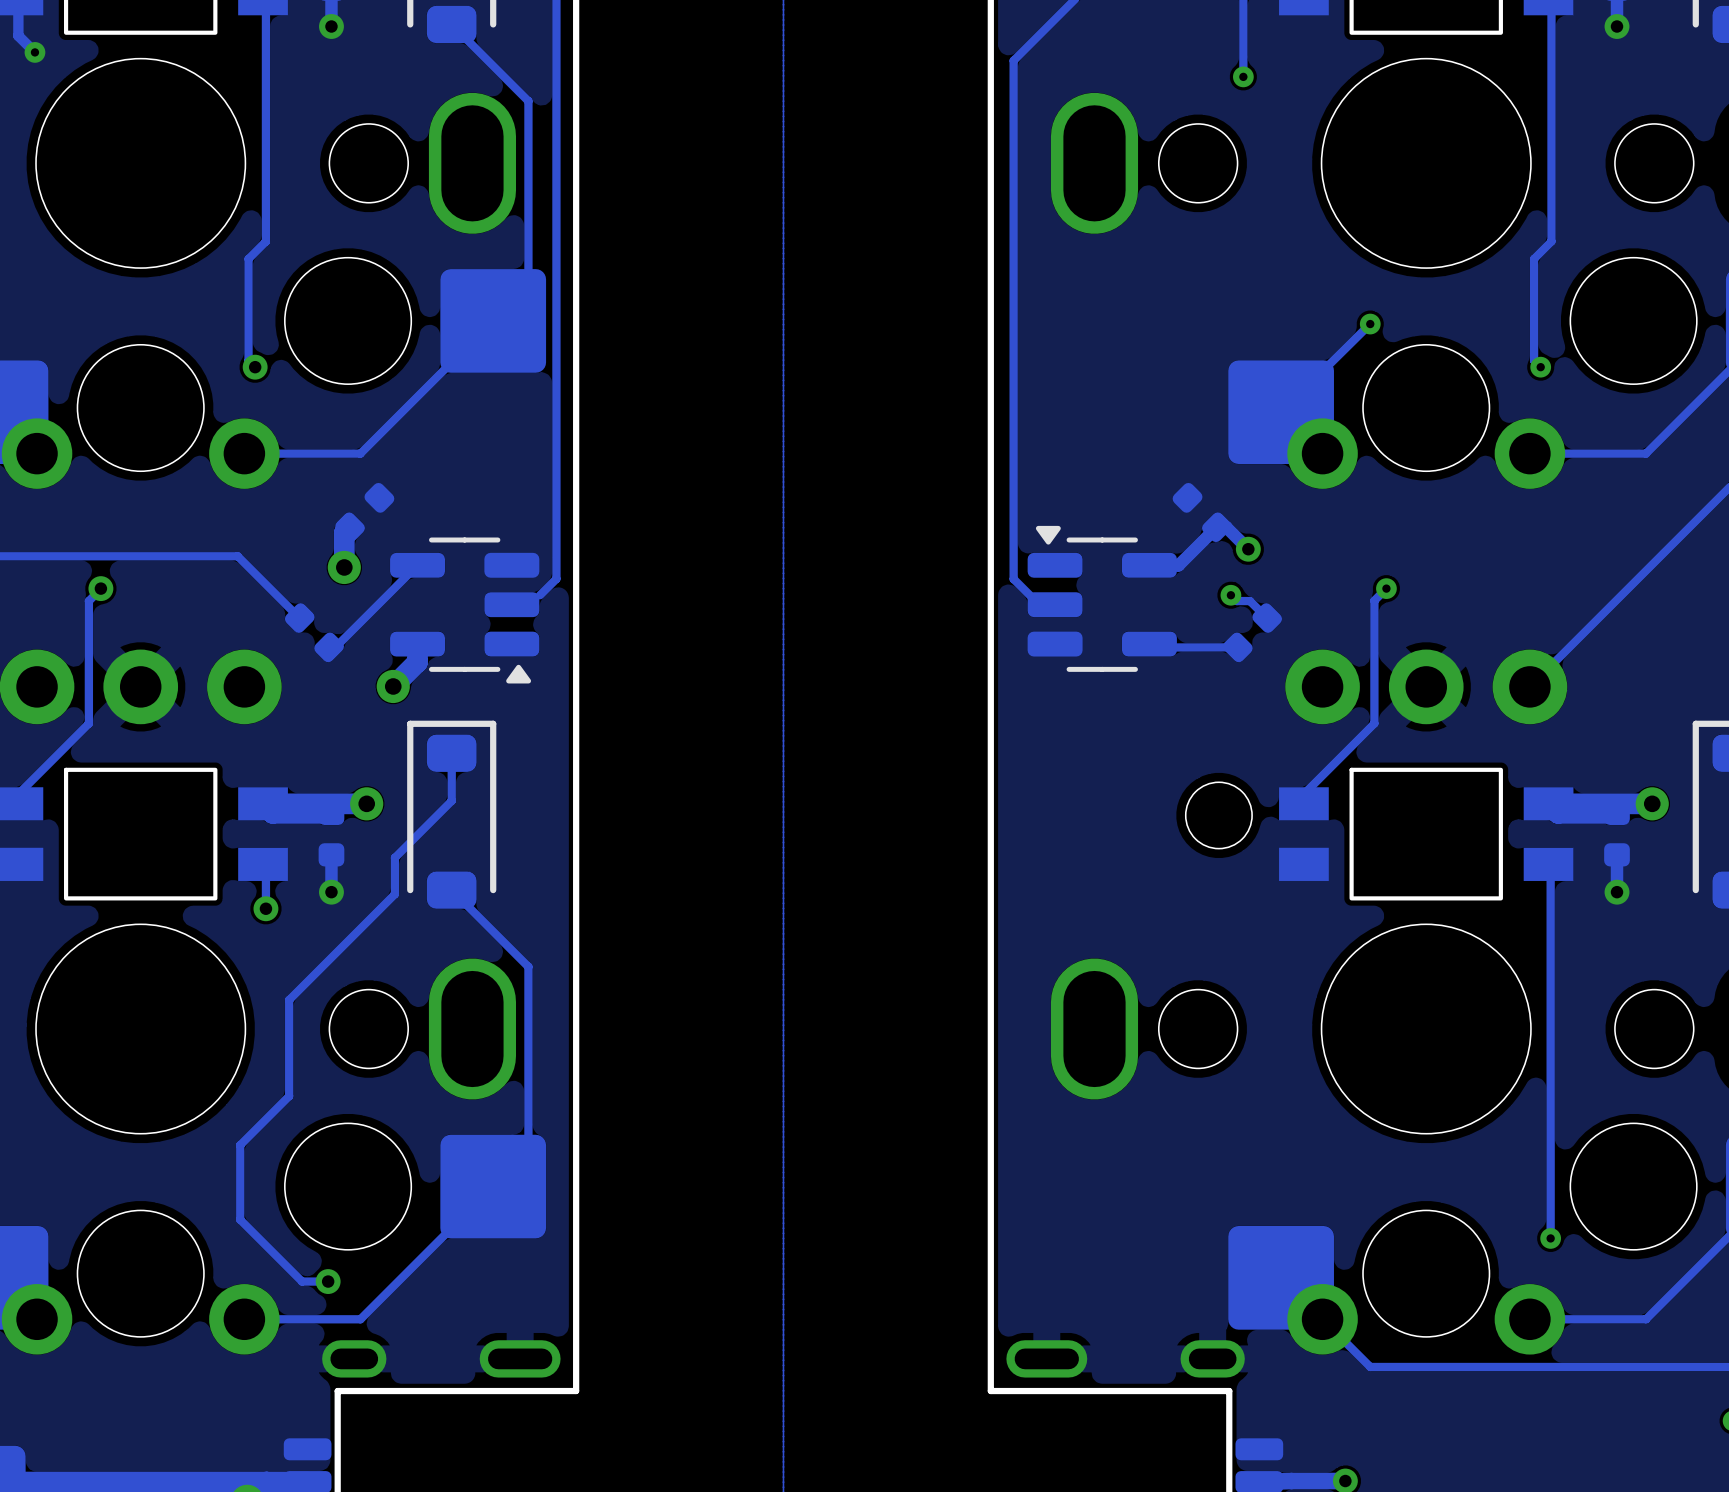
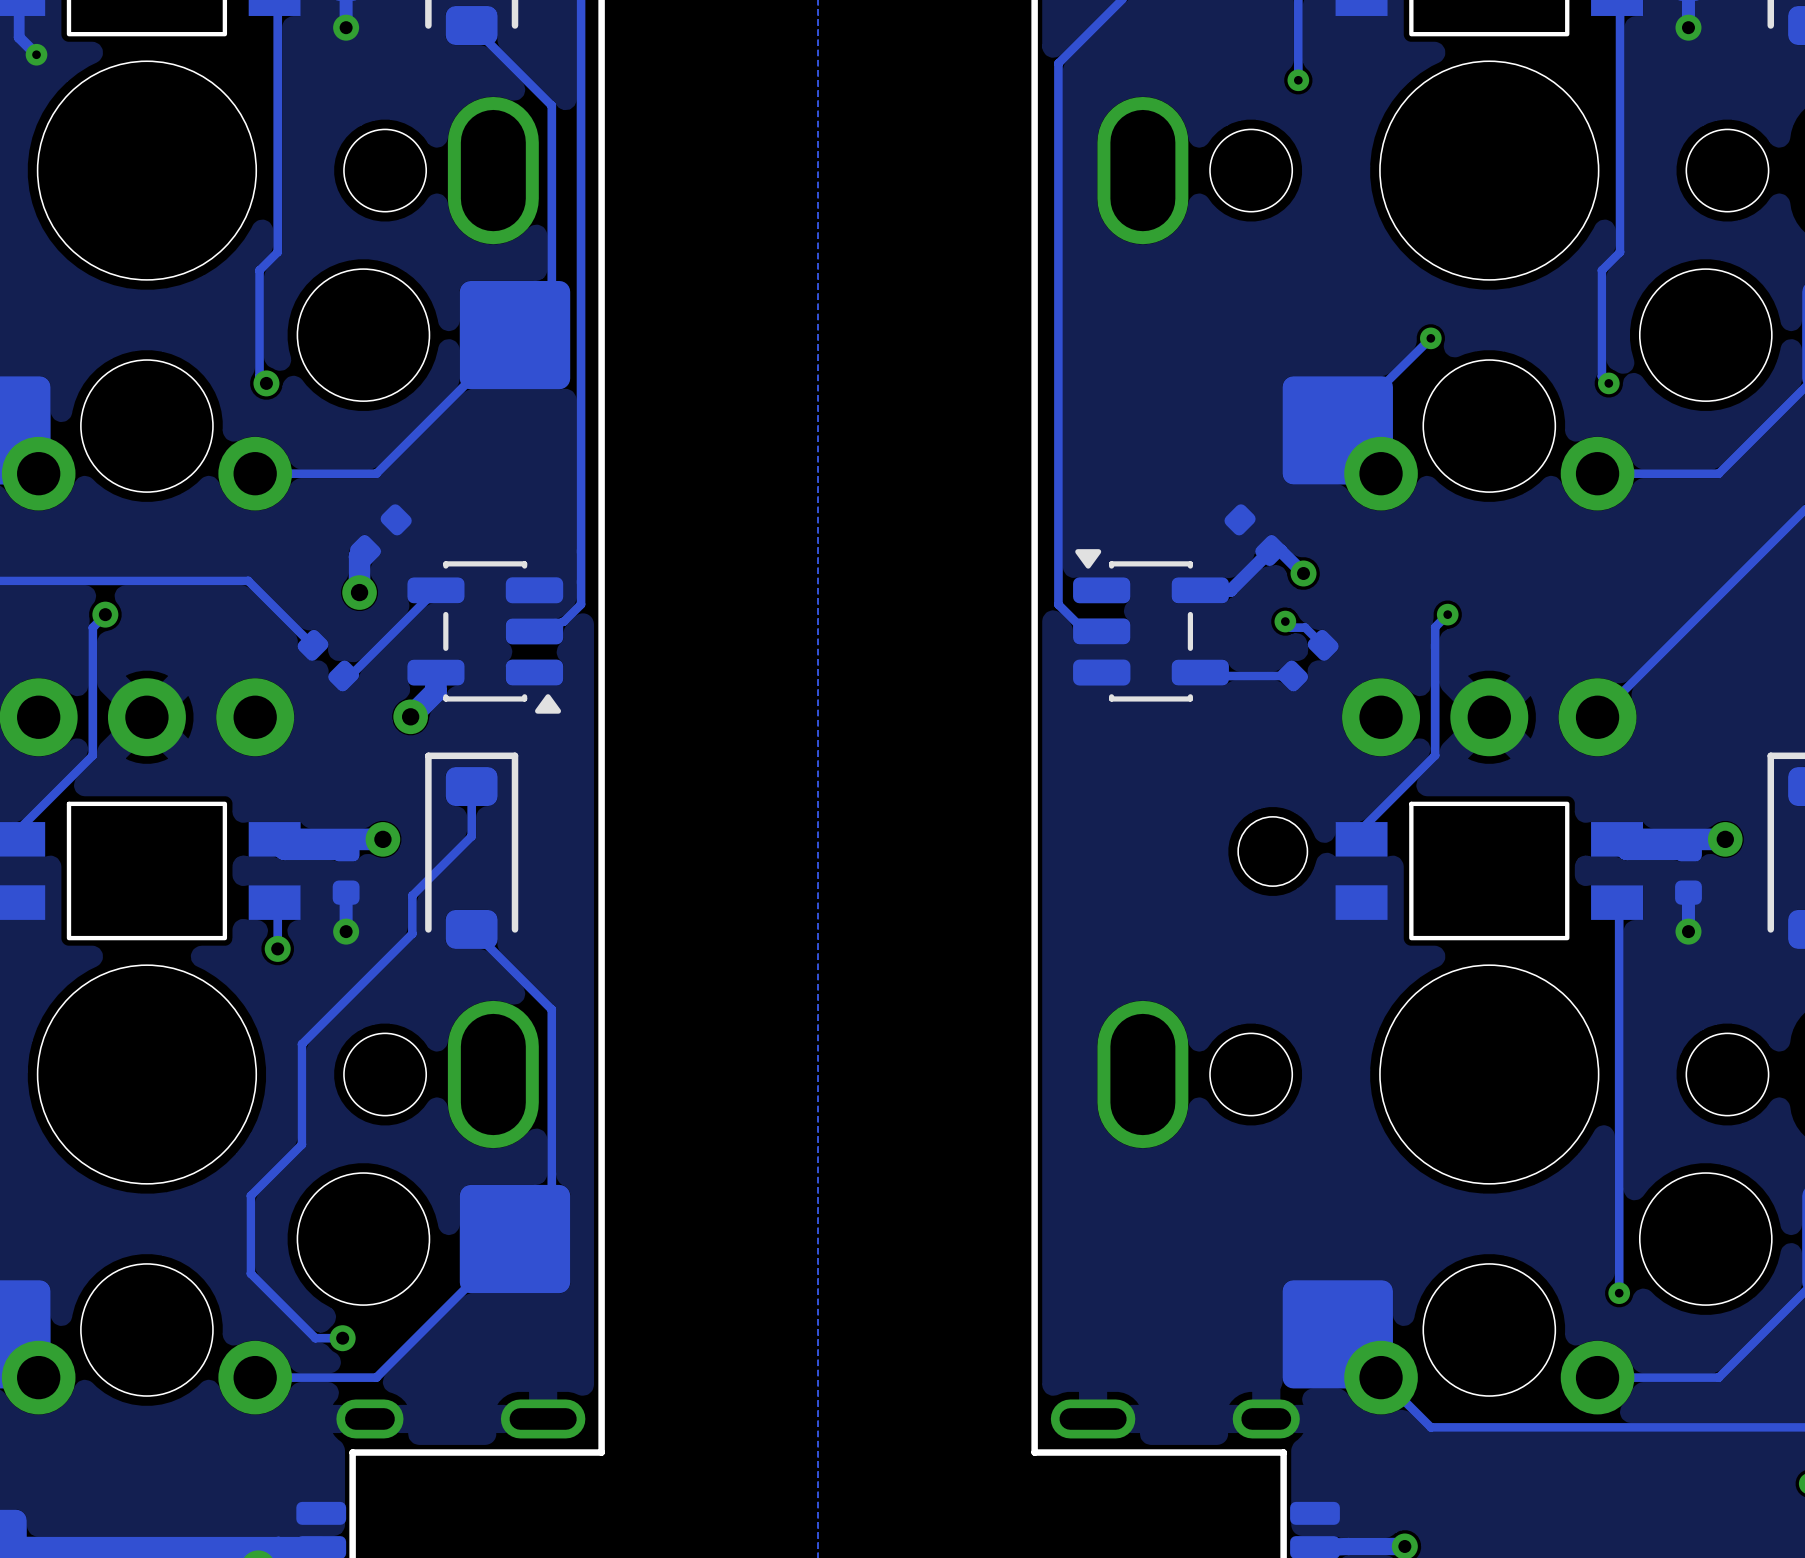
part footprint: [1027, 525, 1177, 672] -> [1073, 549, 1229, 702]
part footprint: [390, 537, 540, 684] -> [407, 561, 564, 714]

